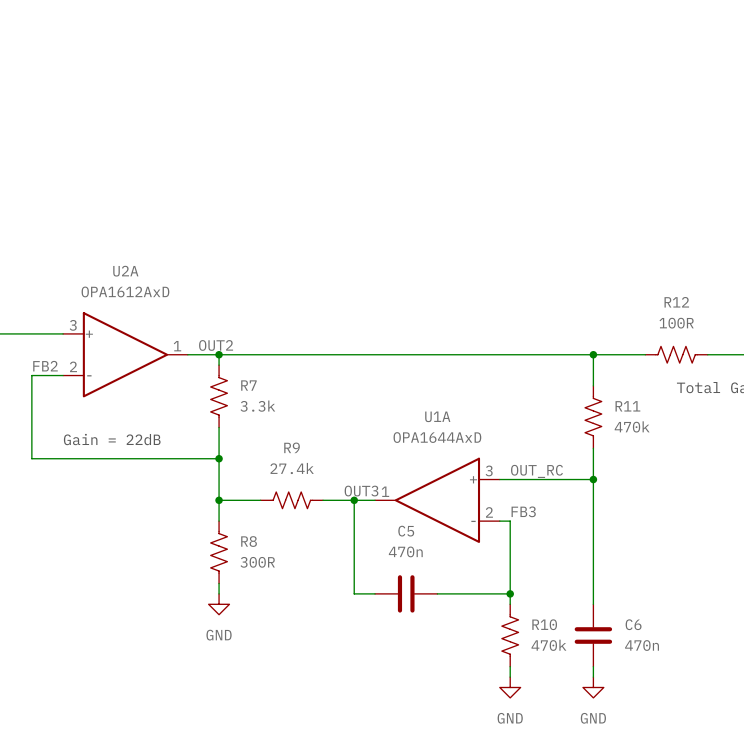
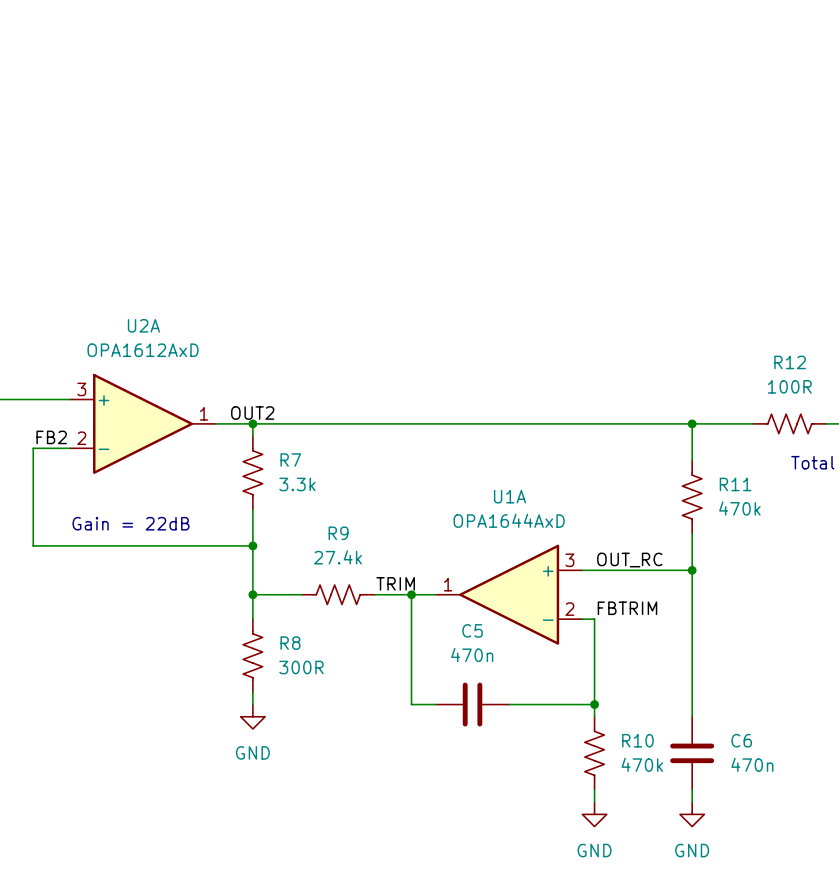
label: none -> TRIM (395, 583)
label: OUT3 (361, 491) -> none
label: FB3 (523, 511) -> FBTRIM (627, 608)

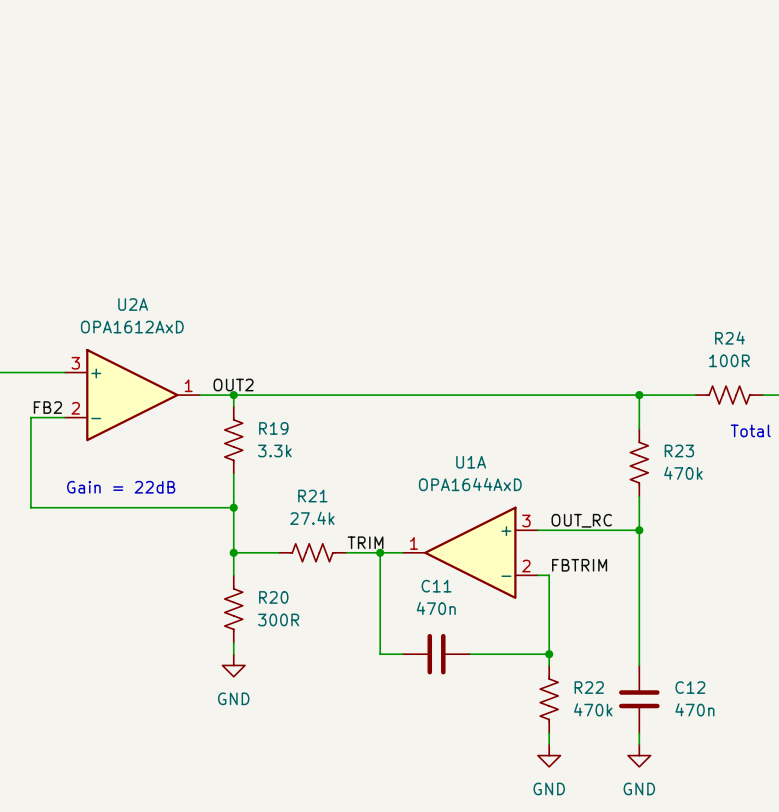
R12 name: R12 (790, 362) -> R24 (729, 338)
R7 name: R7 (290, 460) -> R19 (273, 428)
R11 name: R11 (735, 484) -> R23 (679, 450)
R9 name: R9 (338, 533) -> R21 (312, 496)
C5 name: C5 (472, 630) -> C11 (436, 586)
R8 name: R8 (290, 643) -> R20 (273, 597)
R10 name: R10 (637, 740) -> R22 (589, 687)
C6 name: C6 (741, 740) -> C12 (690, 687)

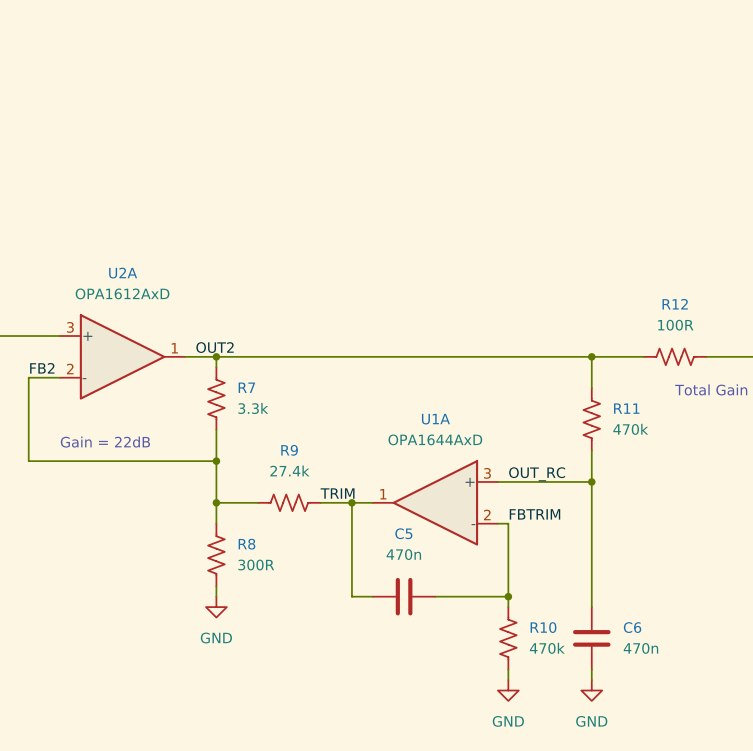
R24 name: R24 (729, 338) -> R12 (675, 304)
R19 name: R19 (273, 428) -> R7 (246, 387)
R23 name: R23 (679, 450) -> R11 (626, 408)
R21 name: R21 (312, 496) -> R9 (289, 450)
C11 name: C11 (436, 586) -> C5 (403, 533)
R20 name: R20 (273, 597) -> R8 (246, 544)
R22 name: R22 (589, 687) -> R10 (543, 627)
C12 name: C12 (690, 687) -> C6 (632, 627)

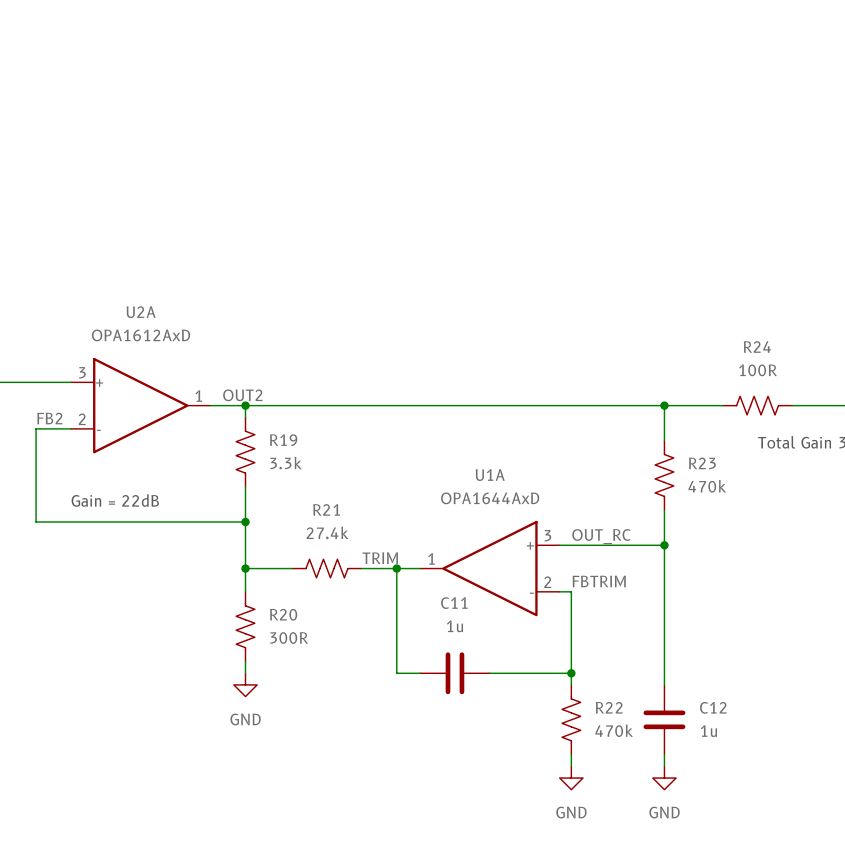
R12 name: R12 (675, 304) -> R24 (757, 347)
R7 name: R7 (246, 387) -> R19 (283, 440)
R11 name: R11 (626, 408) -> R23 (702, 463)
R9 name: R9 (289, 450) -> R21 (326, 509)
C5 name: C5 (403, 533) -> C11 (454, 603)
R8 name: R8 (246, 544) -> R20 (283, 614)
C5 value: 470n (403, 554) -> 1u (454, 626)
R10 name: R10 (543, 627) -> R22 (609, 707)
C6 name: C6 (632, 627) -> C12 (713, 707)
C6 value: 470n (640, 648) -> 1u (708, 731)

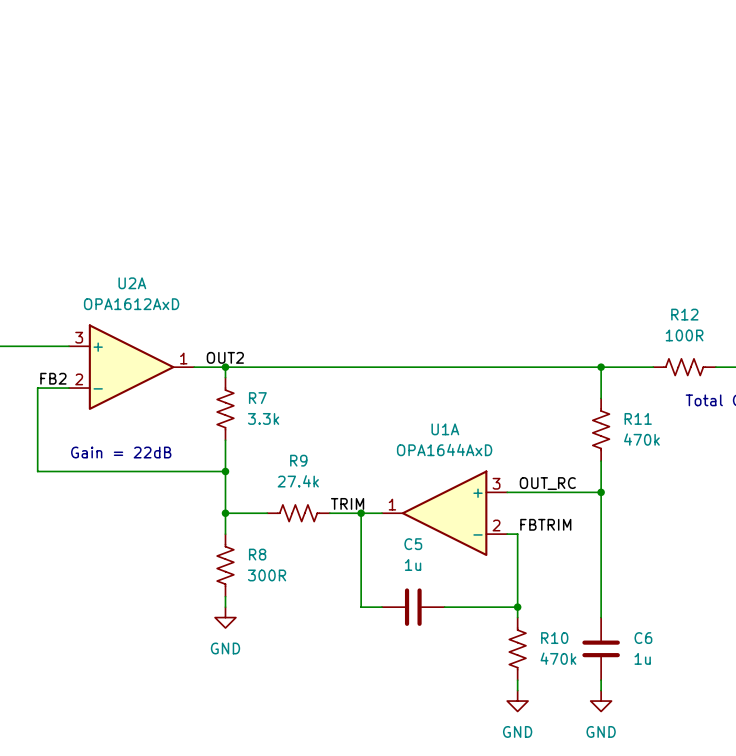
R24 name: R24 (757, 347) -> R12 (684, 314)
R19 name: R19 (283, 440) -> R7 (257, 398)
R23 name: R23 (702, 463) -> R11 (638, 418)
R21 name: R21 (326, 509) -> R9 (298, 460)
C11 name: C11 (454, 603) -> C5 (413, 544)
R20 name: R20 (283, 614) -> R8 (257, 554)
R22 name: R22 (609, 707) -> R10 (554, 638)
C12 name: C12 (713, 707) -> C6 (643, 638)

